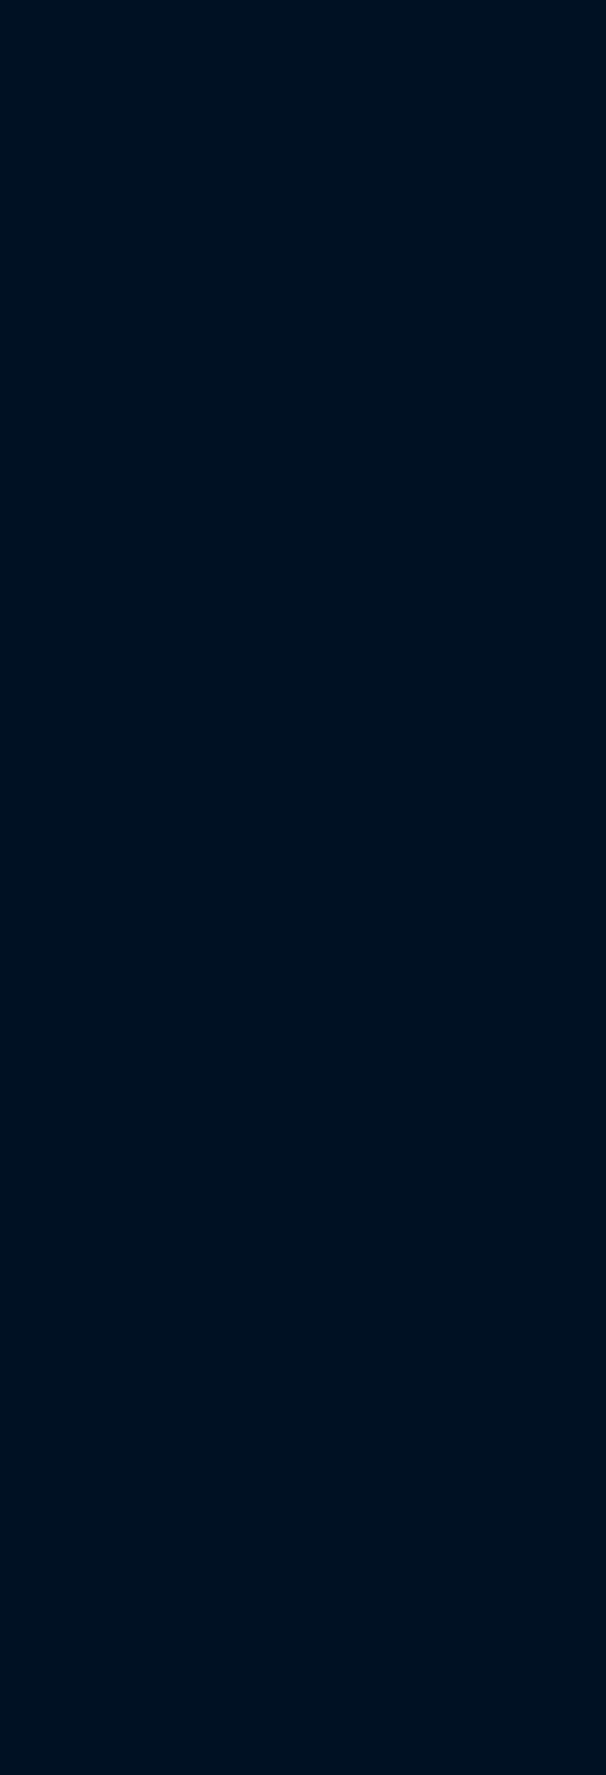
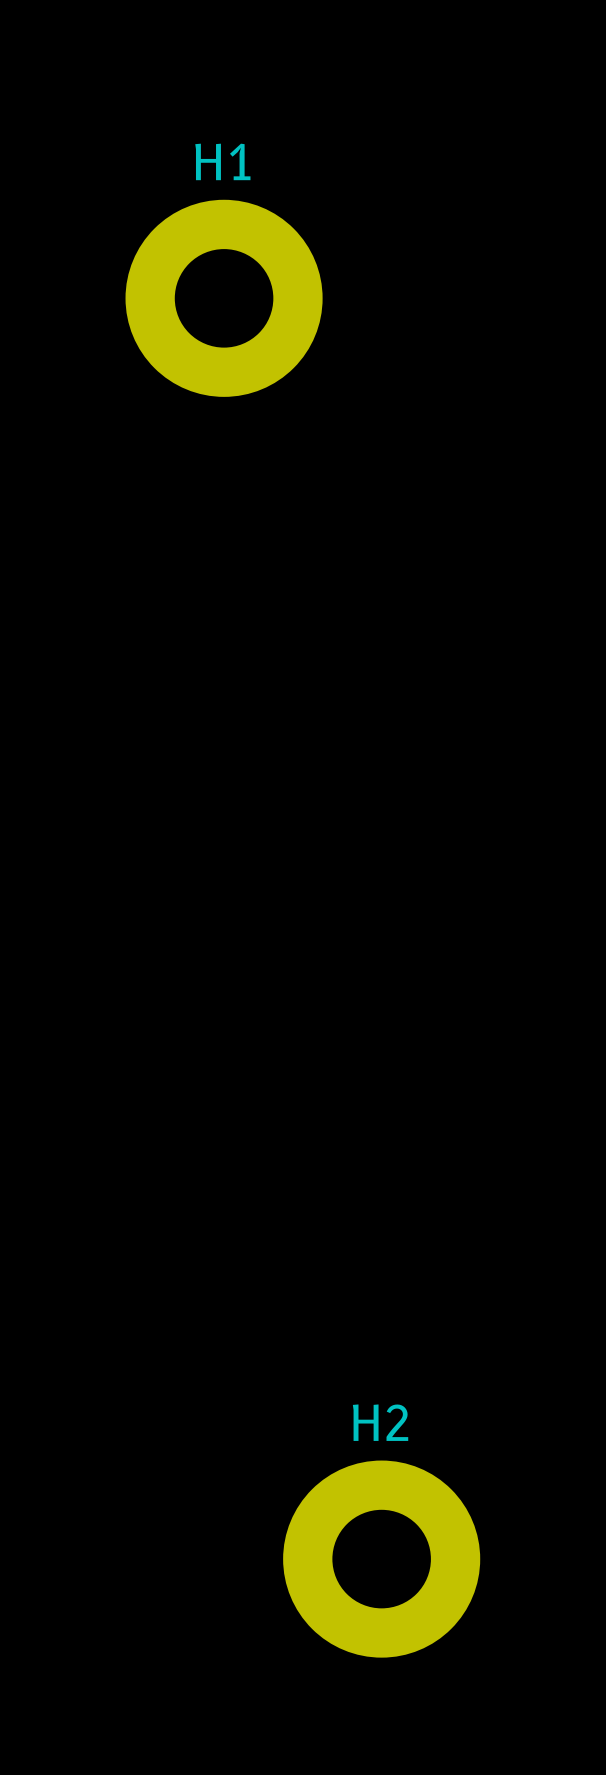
H1: none -> (224, 298)
H2: none -> (381, 1559)

